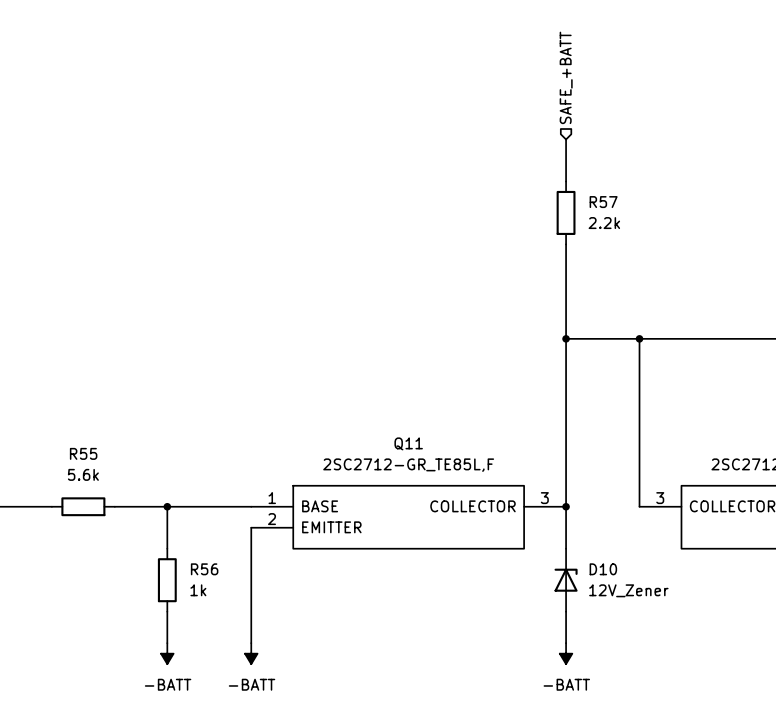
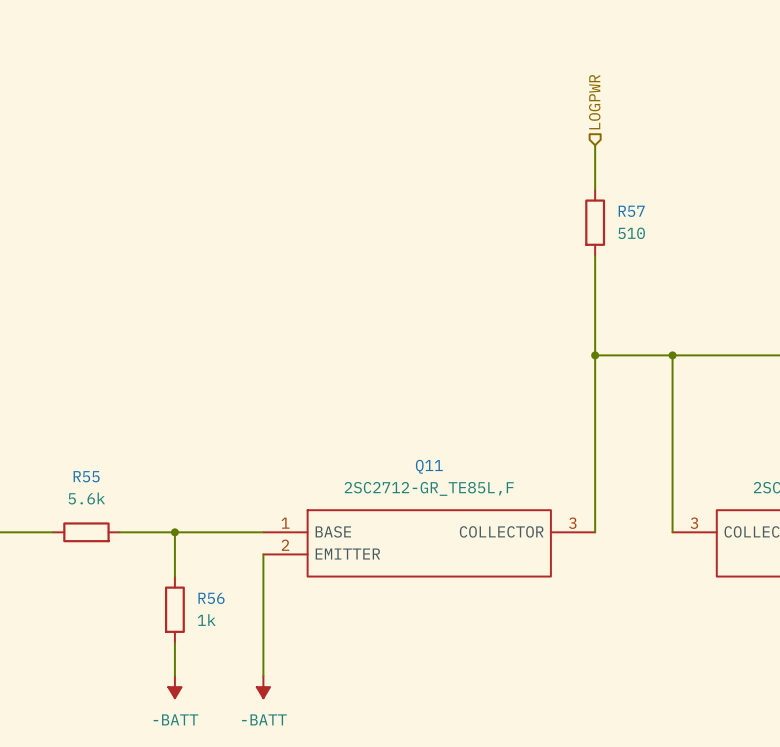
hierarchical label: SAFE_+BATT (566, 77) -> LOGPWR (594, 102)
R57 value: 2.2k (604, 223) -> 510 (631, 233)
wire: (566, 506) (566, 548) -> none
junction: (566, 506) -> none
D10: 12V_Zener (566, 580) -> none
wire: (566, 611) (566, 643) -> none
power symbol: -BATT (566, 653) -> none

